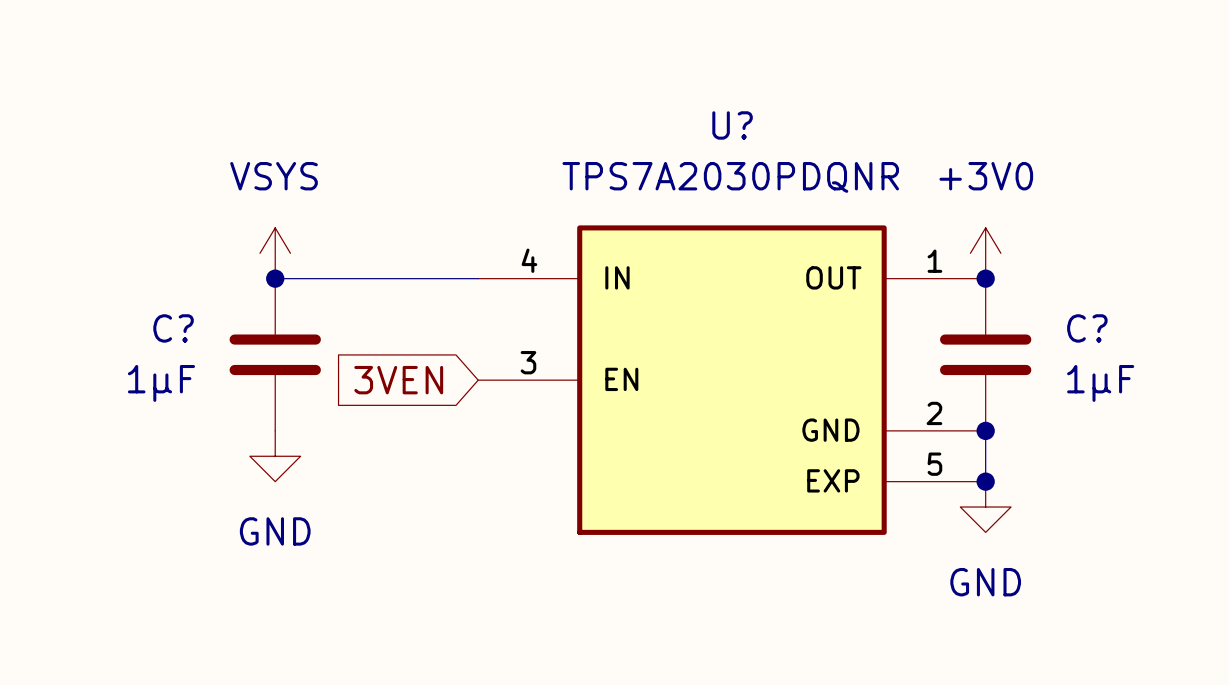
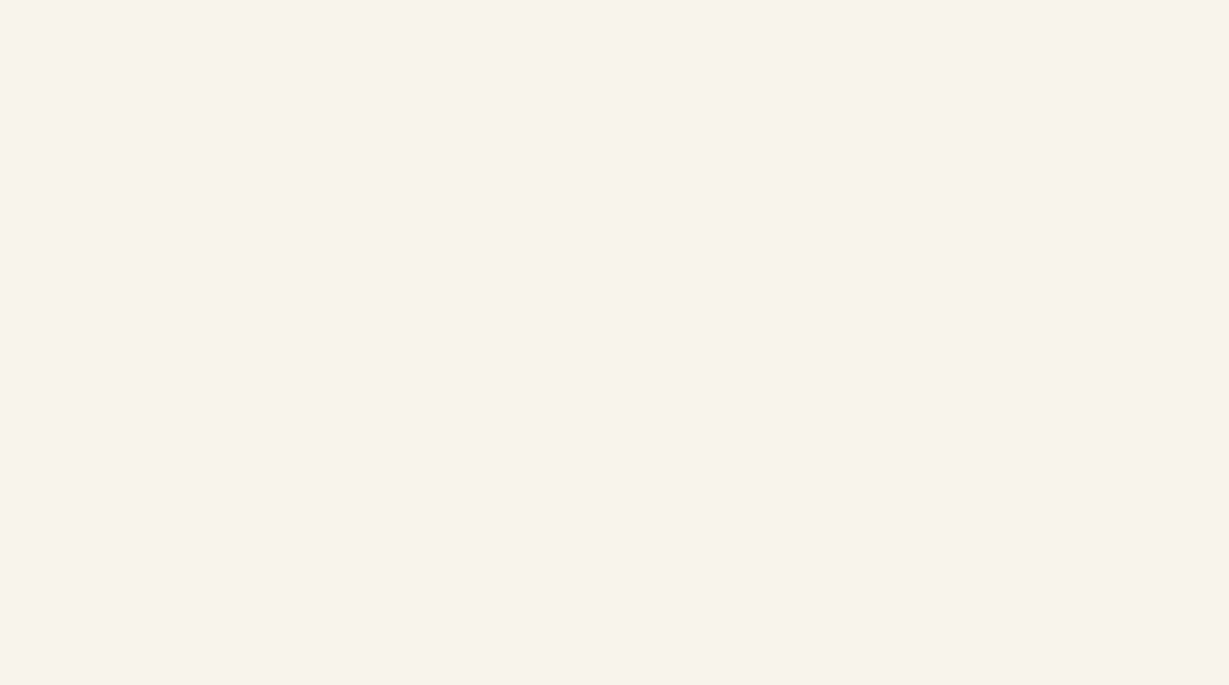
power symbol: VSYS (275, 253) -> none
power symbol: +3V0 (985, 253) -> none
wire: (275, 278) (478, 278) -> none
junction: (275, 278) -> none
junction: (985, 278) -> none
C?: 1µF (275, 354) -> none
C?: 1µF (985, 354) -> none
global label: 3VEN (398, 380) -> none
U?: TPS7A2030PDQNR (731, 380) -> none
wire: (985, 430) (985, 481) -> none
junction: (985, 430) -> none
power symbol: GND (275, 456) -> none
junction: (985, 481) -> none
power symbol: GND (985, 507) -> none

